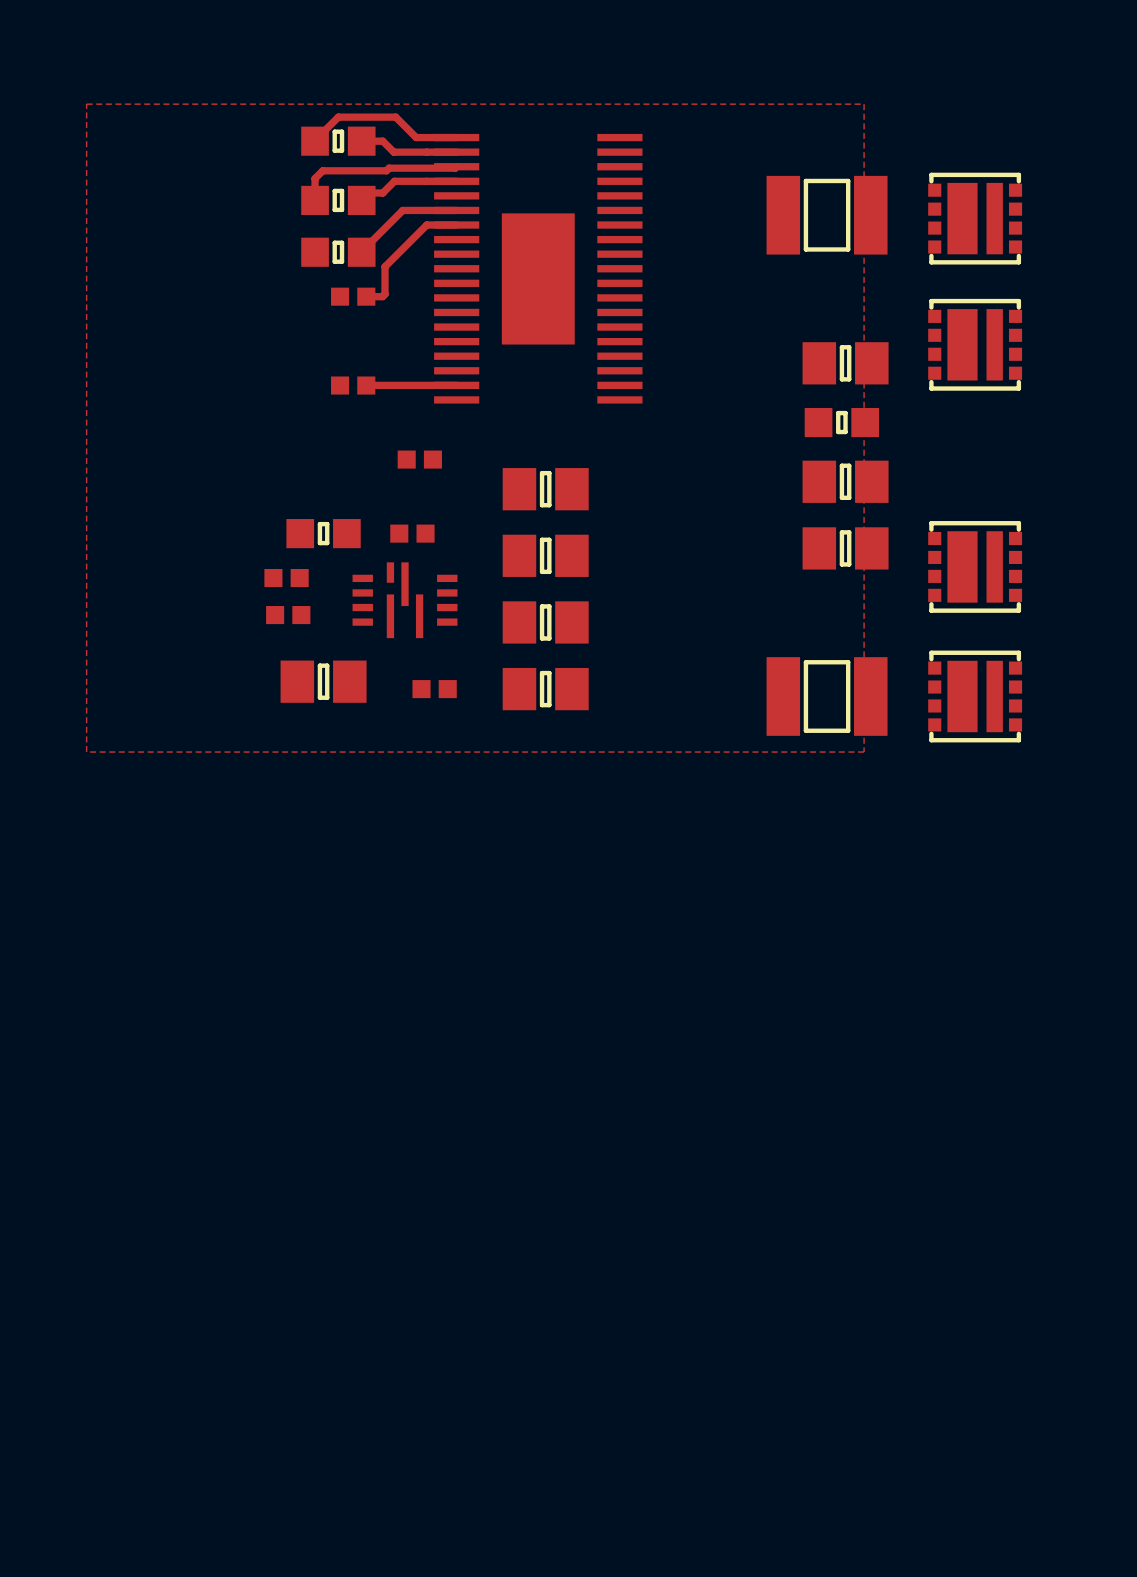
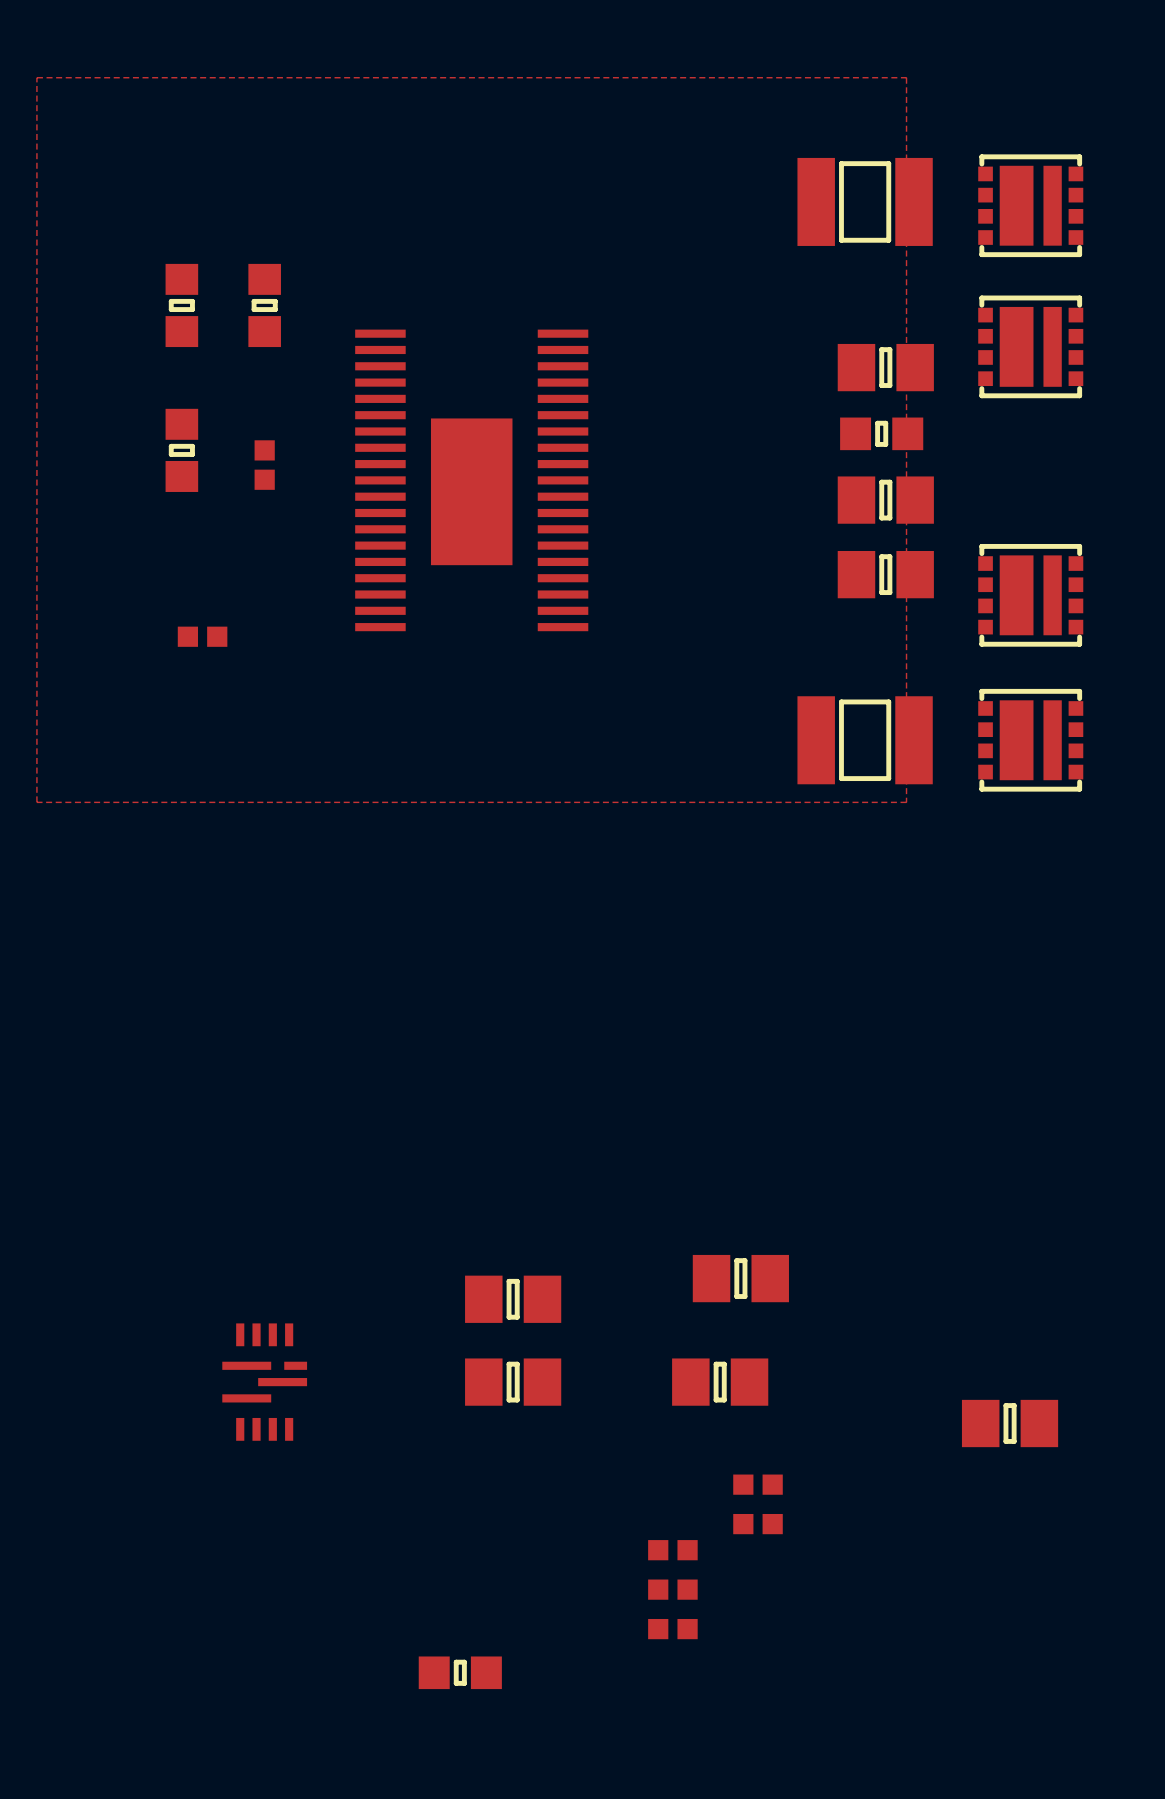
track: (456, 137) (416, 137) (395, 117) (338, 117) (315, 141) -> none
part: (338, 141) -> none
track: (361, 141) (382, 141) (393, 152) (456, 152) -> none
track: (456, 166) (389, 168) (386, 170) (322, 170) (315, 178) (315, 200) -> none
track: (456, 181) (394, 181) (382, 193) (361, 193) -> none
part: (338, 200) -> none
track: (456, 210) (402, 210) (361, 252) -> none
track: (456, 225) (426, 225) (385, 266) (385, 294) (382, 296) (366, 296) -> none
part: (338, 252) -> none
part position: (538, 268) -> (471, 480)
part: (353, 296) -> none
part: none -> (181, 305)
part: none -> (264, 305)
part: (353, 385) -> none
track: (366, 385) (456, 385) -> none
part: none -> (181, 450)
part: none -> (264, 465)
part: (419, 459) -> none
part: (545, 489) -> none
part: (323, 533) -> none
part: (412, 533) -> none
part: (545, 555) -> none
part: (286, 578) -> none
part rotation: 0° (405, 600) -> 90° clockwise (264, 1382)
part position: (405, 600) -> (264, 1382)
part: none -> (202, 636)
part: (288, 615) -> none
part: (545, 622) -> none
part: (323, 681) -> none
part: (434, 689) -> none
part: (545, 689) -> none
part: none -> (740, 1278)
part: none -> (513, 1299)
part: none -> (513, 1382)
part: none -> (720, 1382)
part: none -> (1010, 1423)
part: none -> (758, 1484)
part: none -> (758, 1524)
part: none -> (672, 1550)
part: none -> (672, 1589)
part: none -> (672, 1629)
part: none -> (460, 1672)

